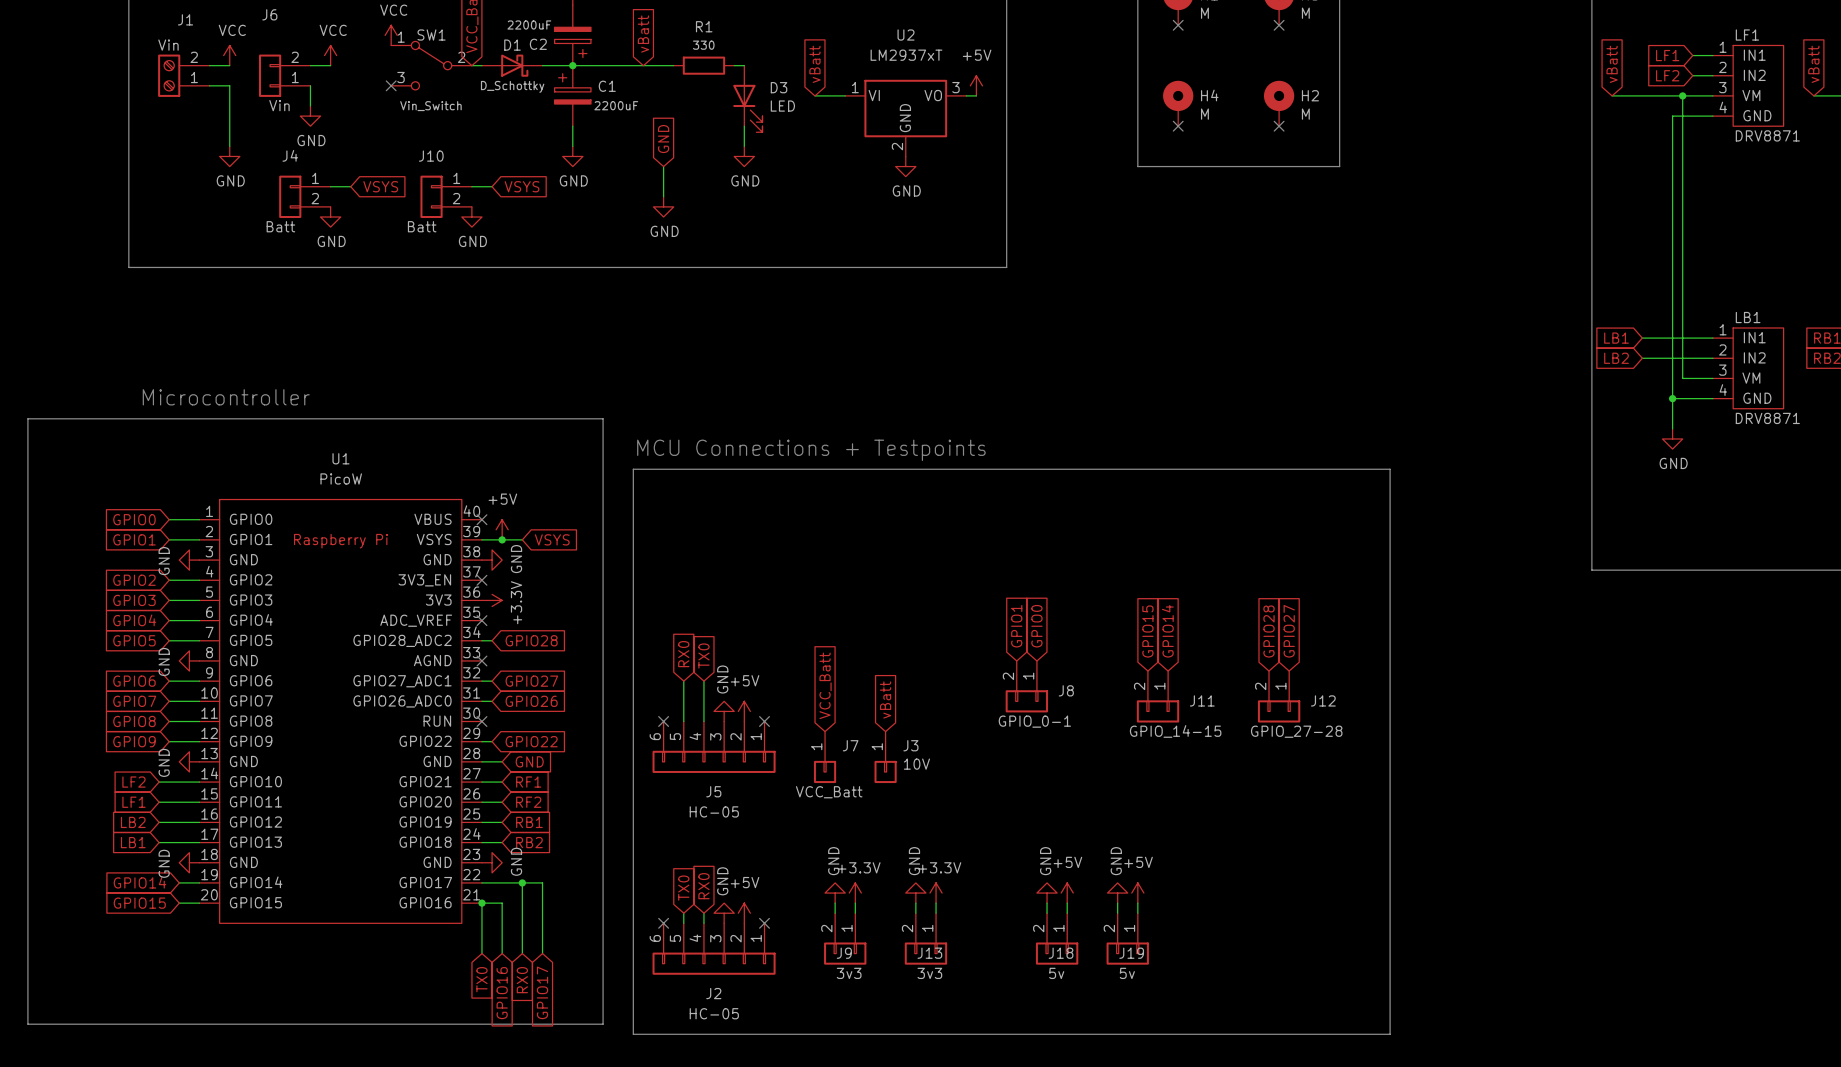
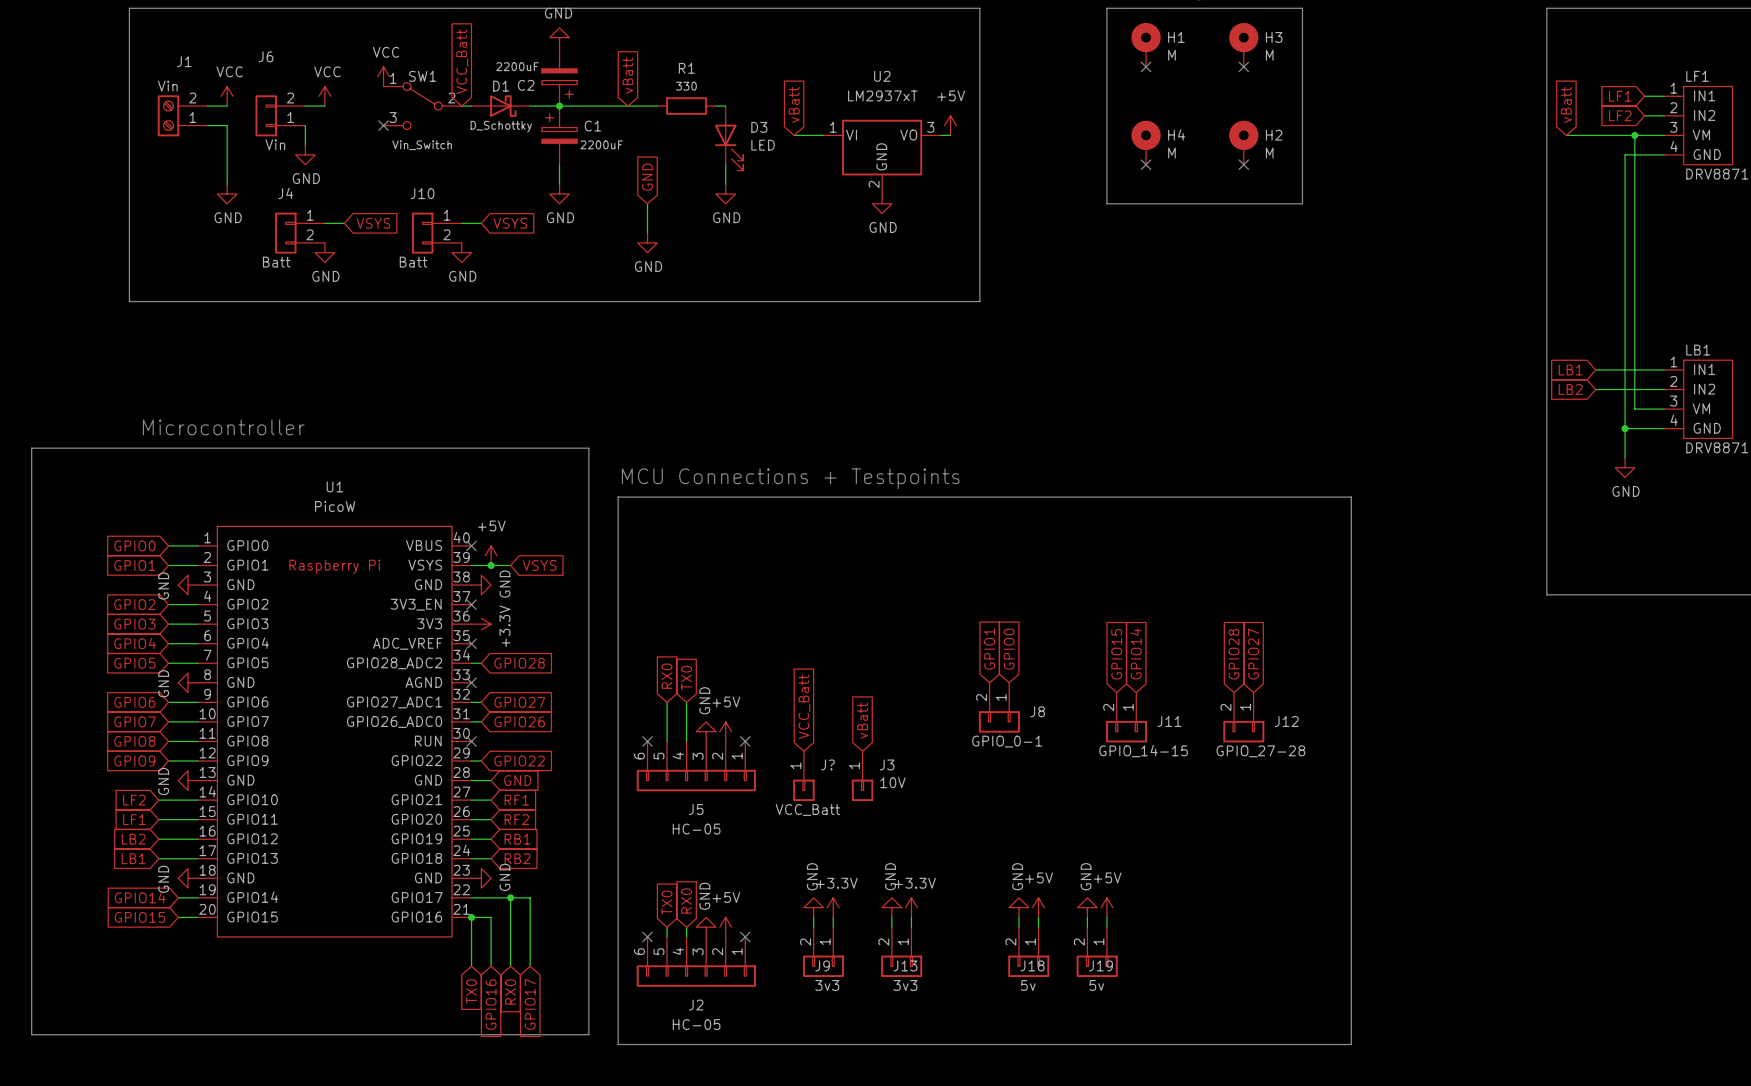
J7 name: J7 (850, 745) -> J? (828, 764)

